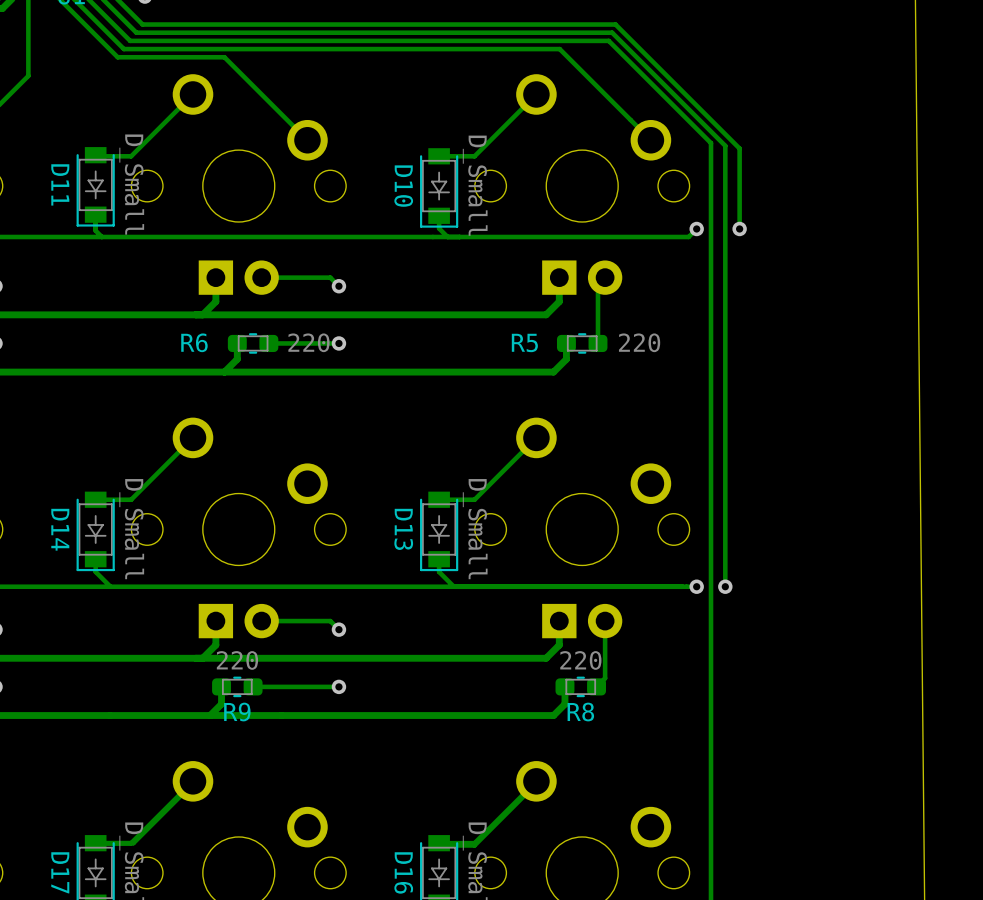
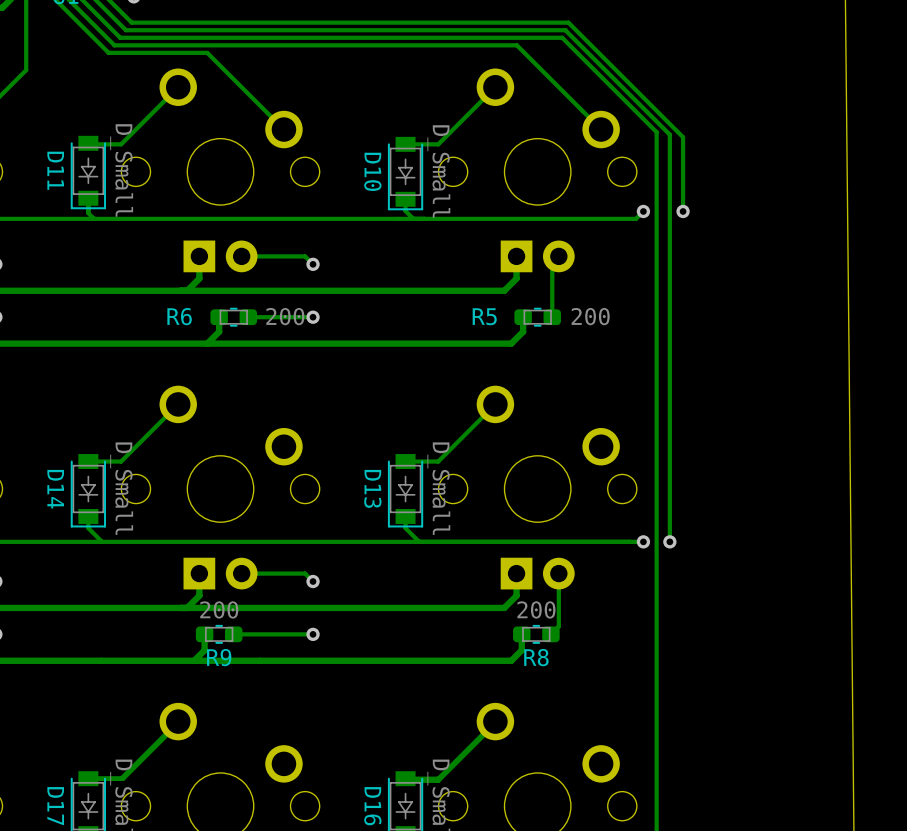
R6 value: 220 (308, 342) -> 200 (285, 316)
R5 value: 220 (639, 342) -> 200 (590, 316)
R9 value: 220 (237, 660) -> 200 (219, 609)
R8 value: 220 (580, 660) -> 200 (536, 609)

